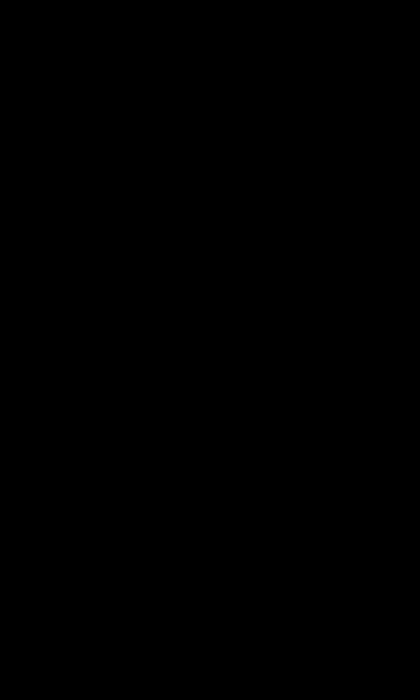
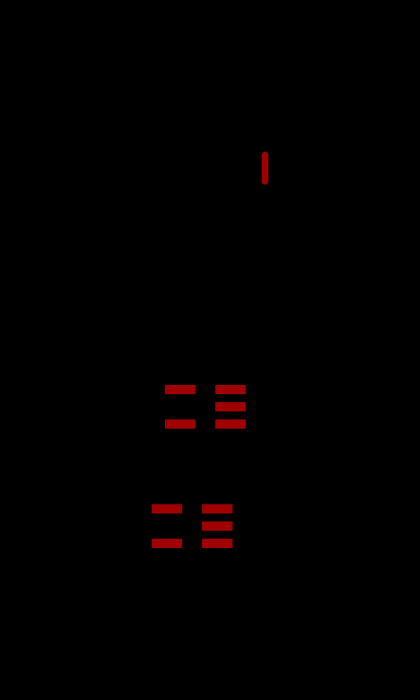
top track: none -> (265, 154) (265, 181)
part: none -> (205, 406)
part: none -> (192, 526)

